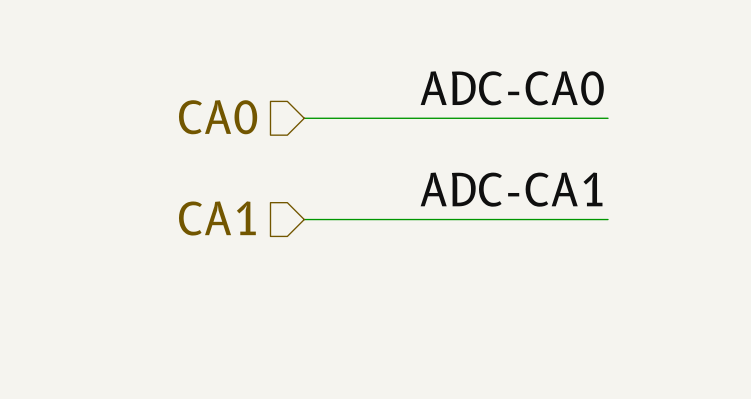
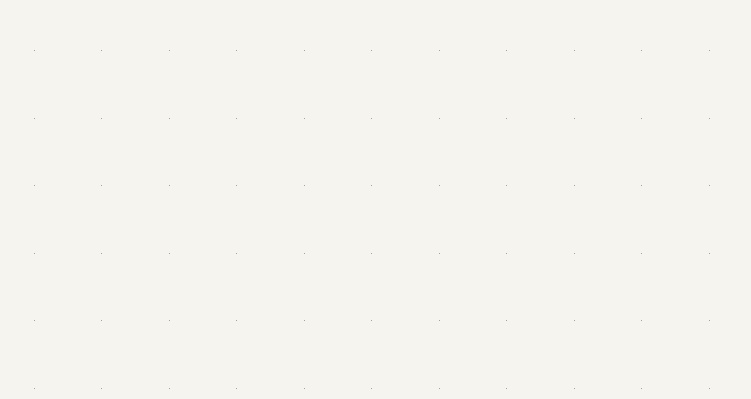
label: ADC-CA0 (512, 88) -> none
hierarchical label: CA0 (218, 117) -> none
wire: (304, 118) (608, 118) -> none
label: ADC-CA1 (511, 189) -> none
hierarchical label: CA1 (217, 218) -> none
wire: (304, 219) (608, 219) -> none

